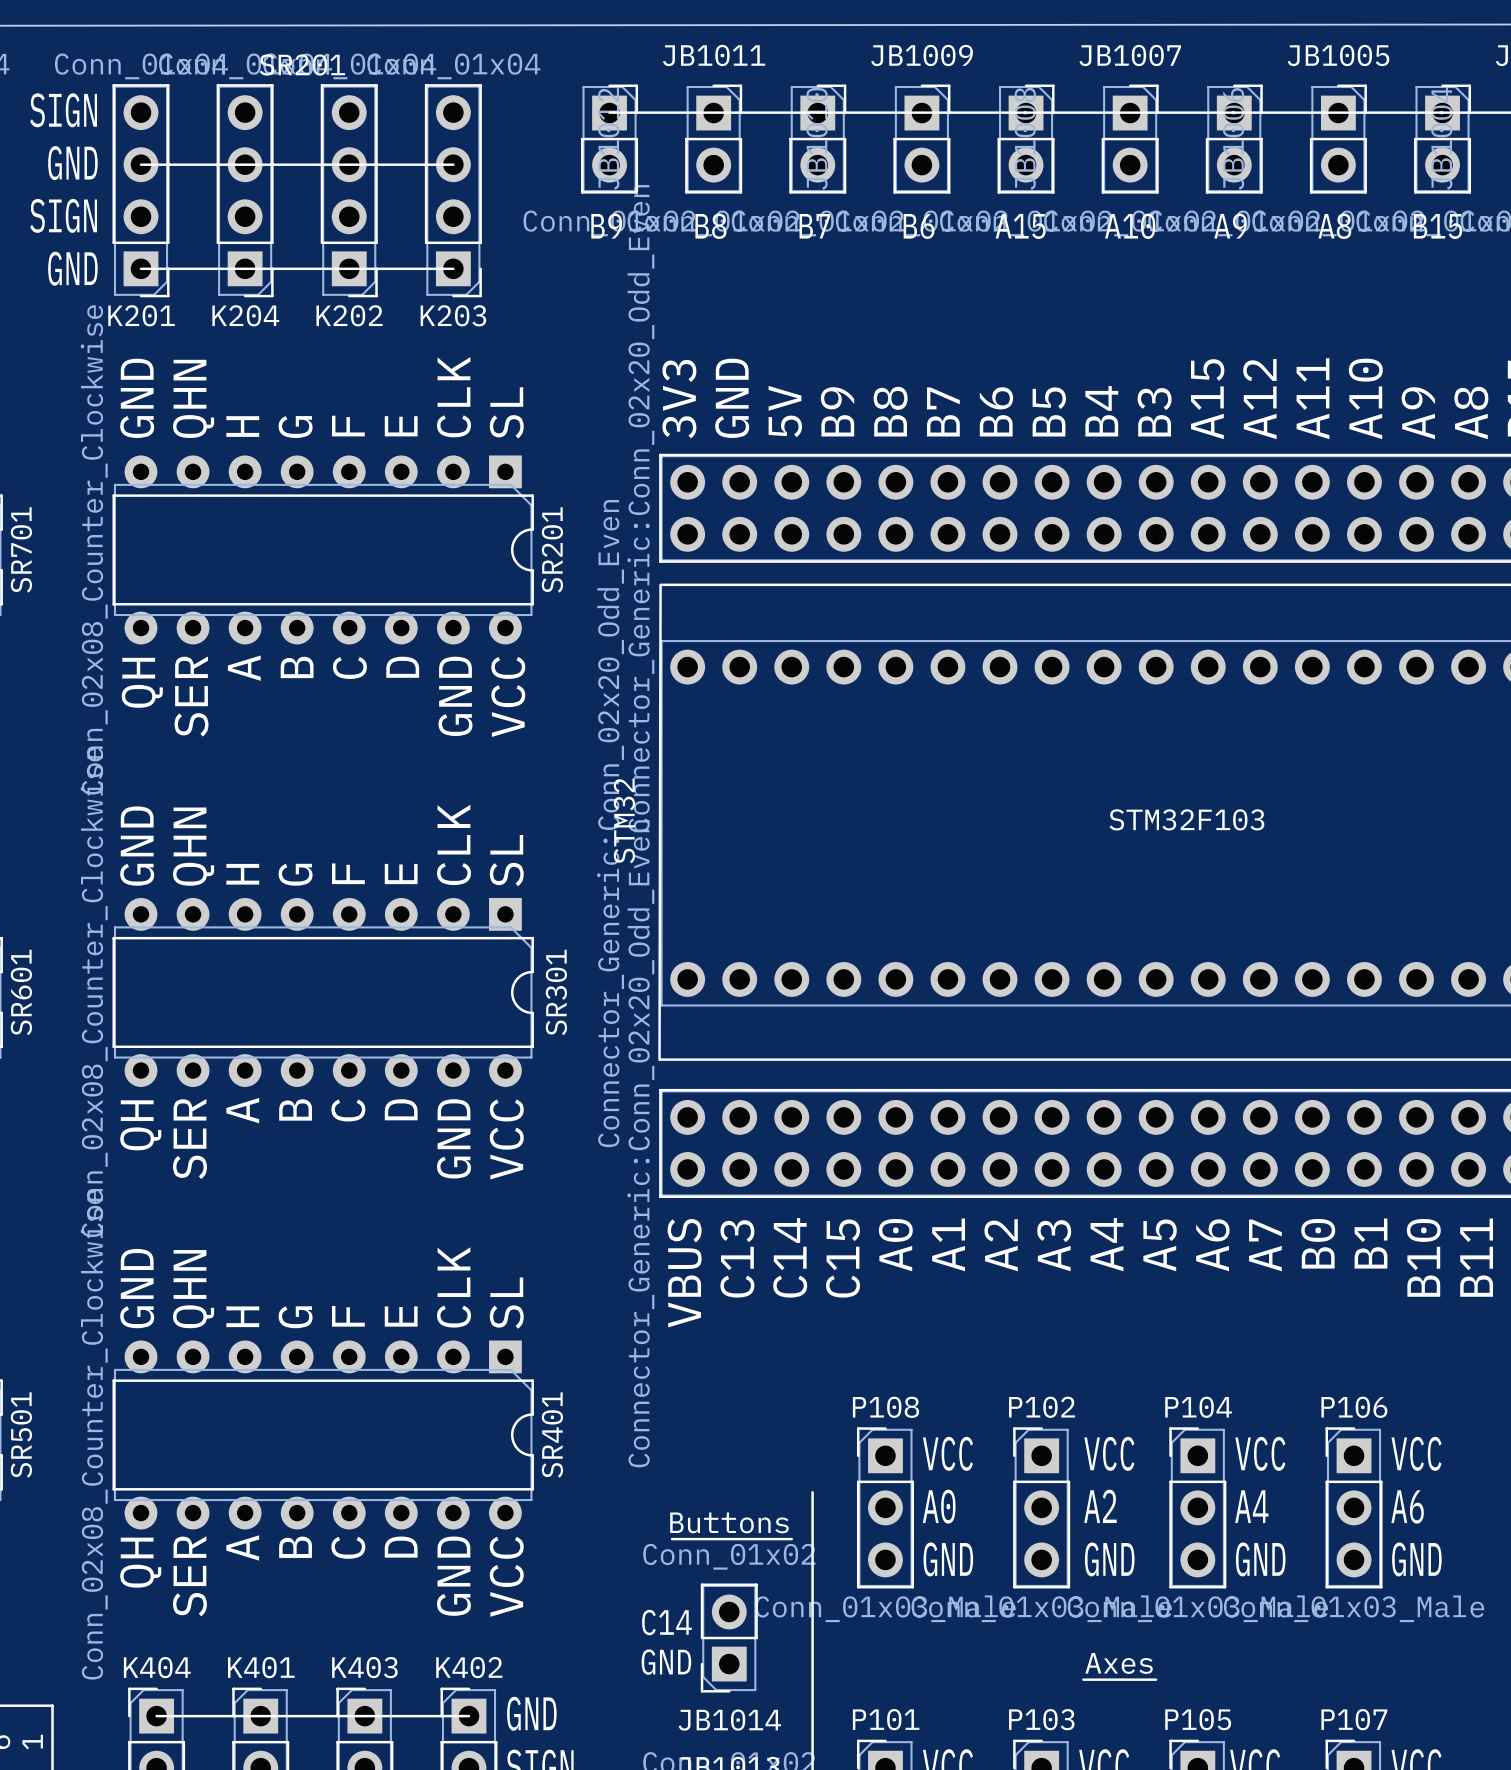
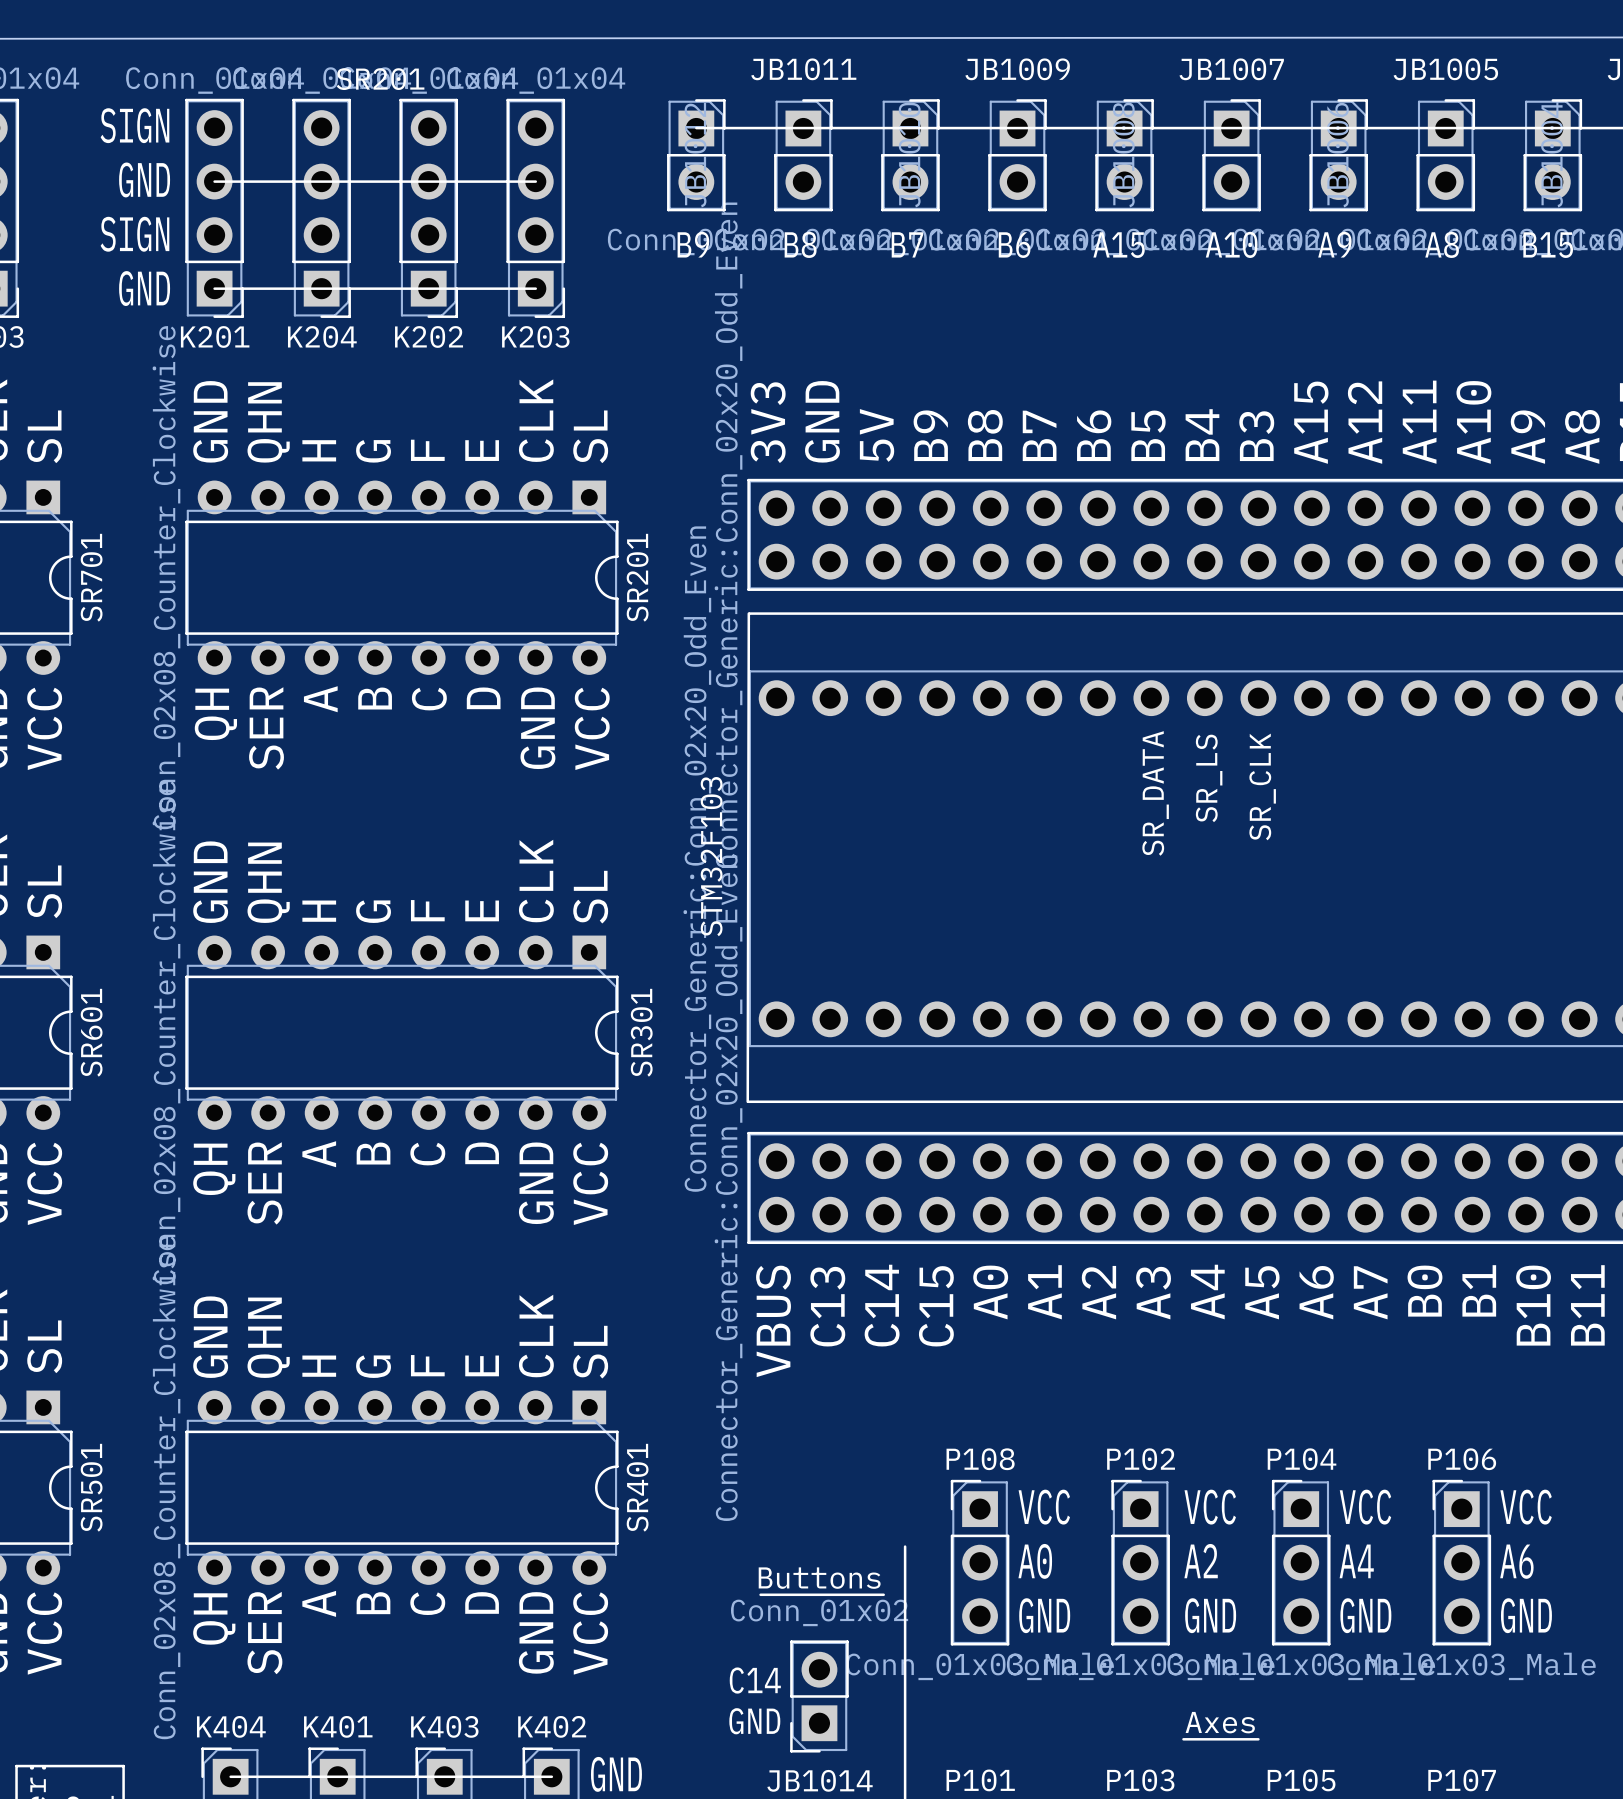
text: none -> SR_LS (1209, 778)
text: none -> SR_CLK (1262, 786)
text: none -> SR_DATA (1155, 793)
text: STM32F103 (1186, 819) -> none
part text: STM32 (624, 820) -> STM32F103 (711, 856)

